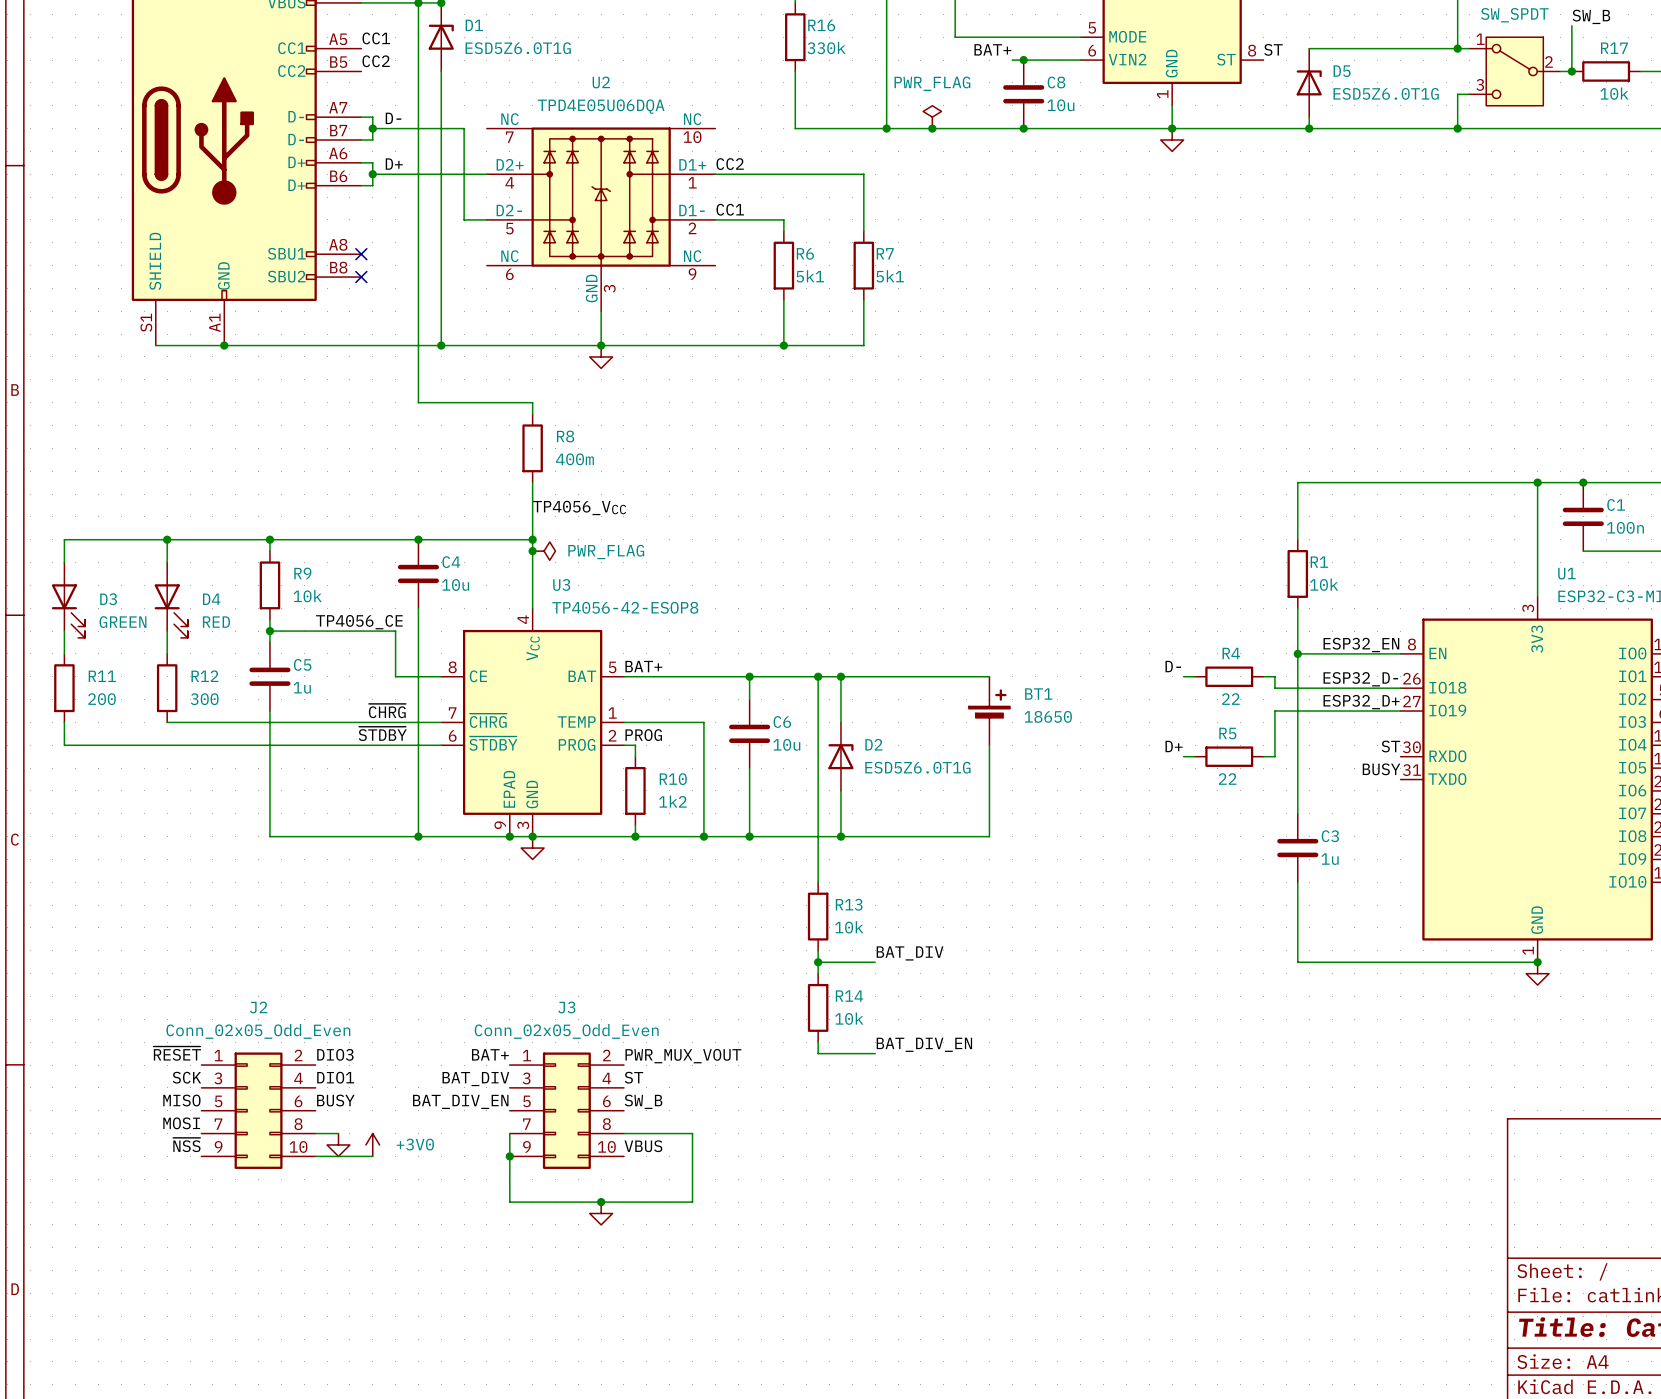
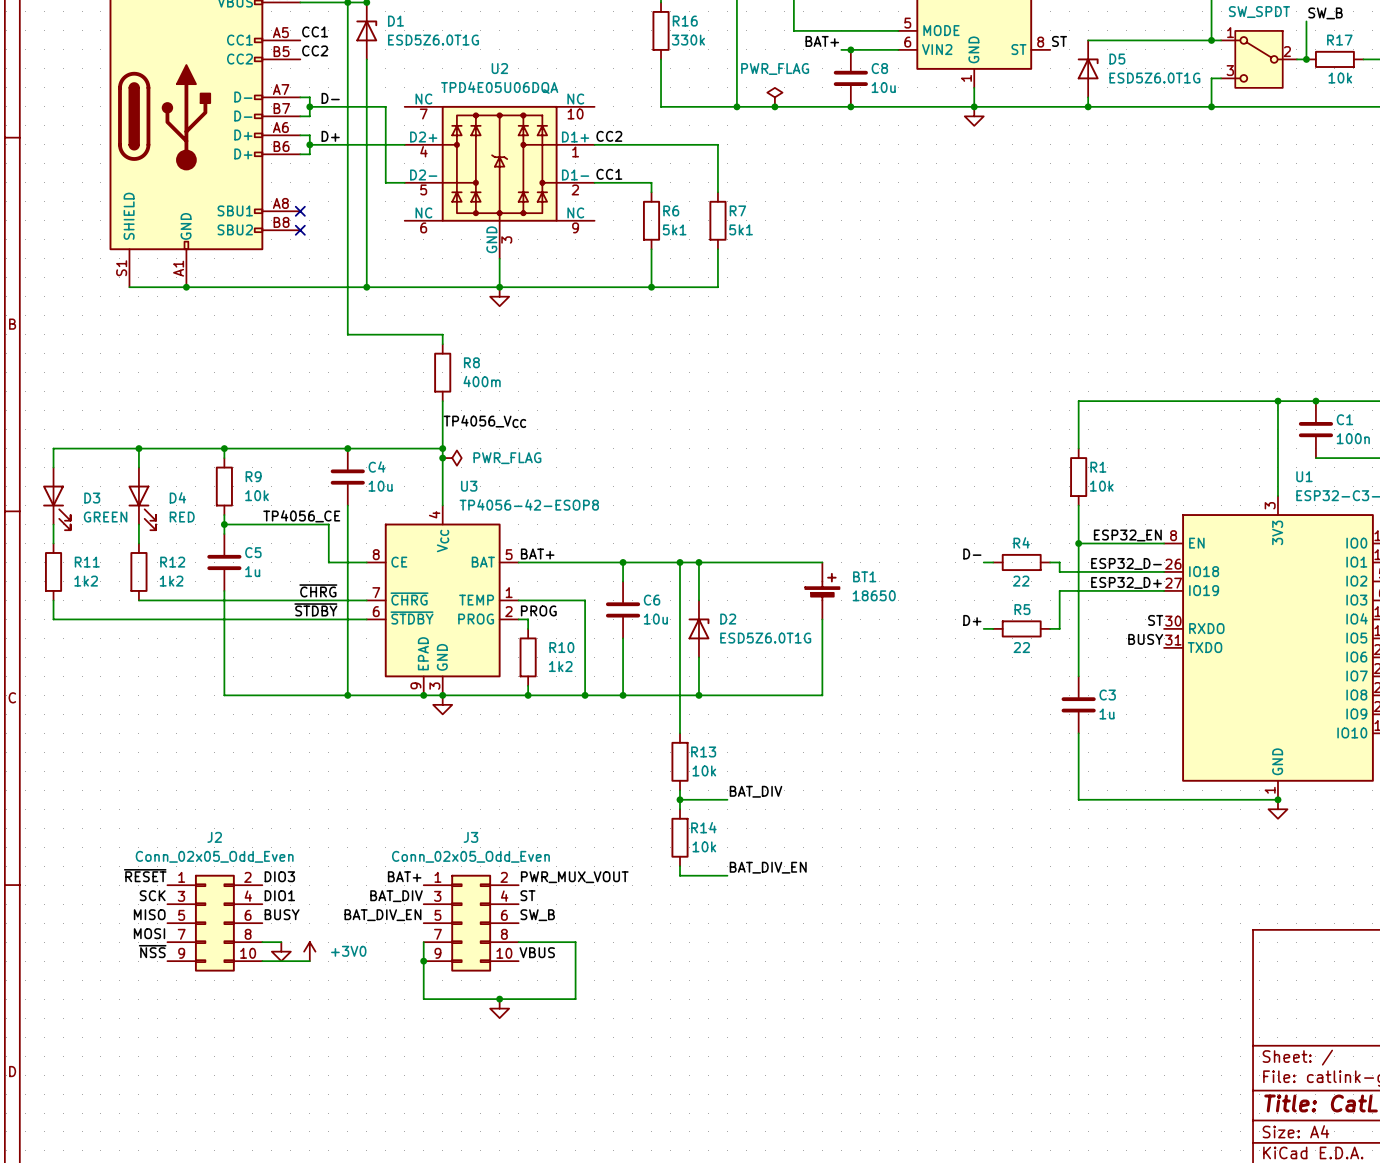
R11 value: 200 (102, 699) -> 1k2 (86, 581)
R12 value: 300 (204, 699) -> 1k2 (171, 581)

